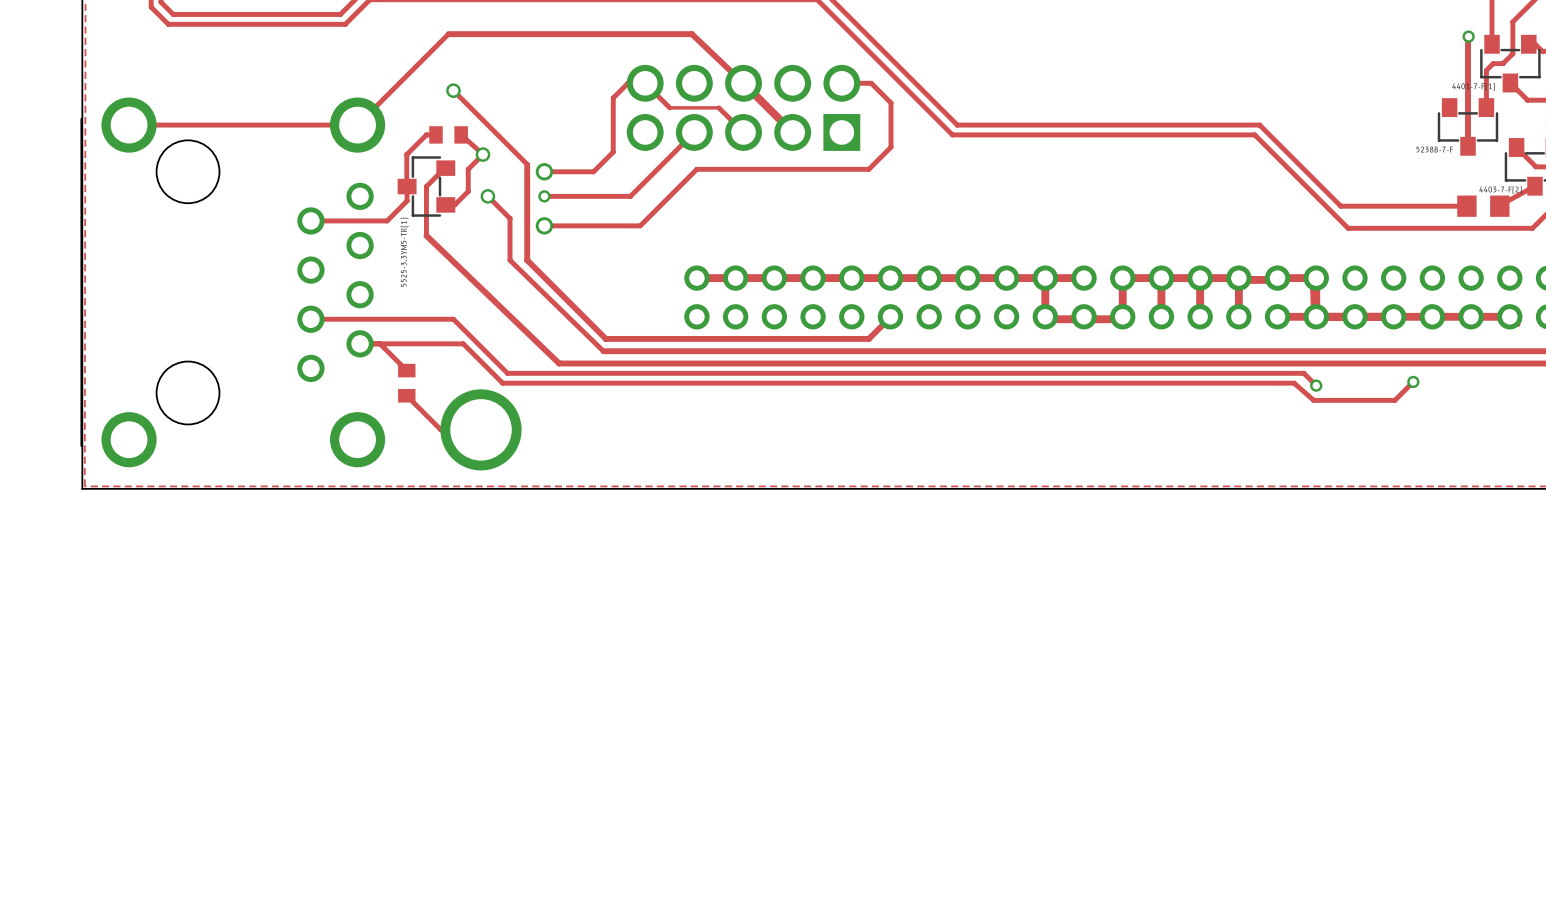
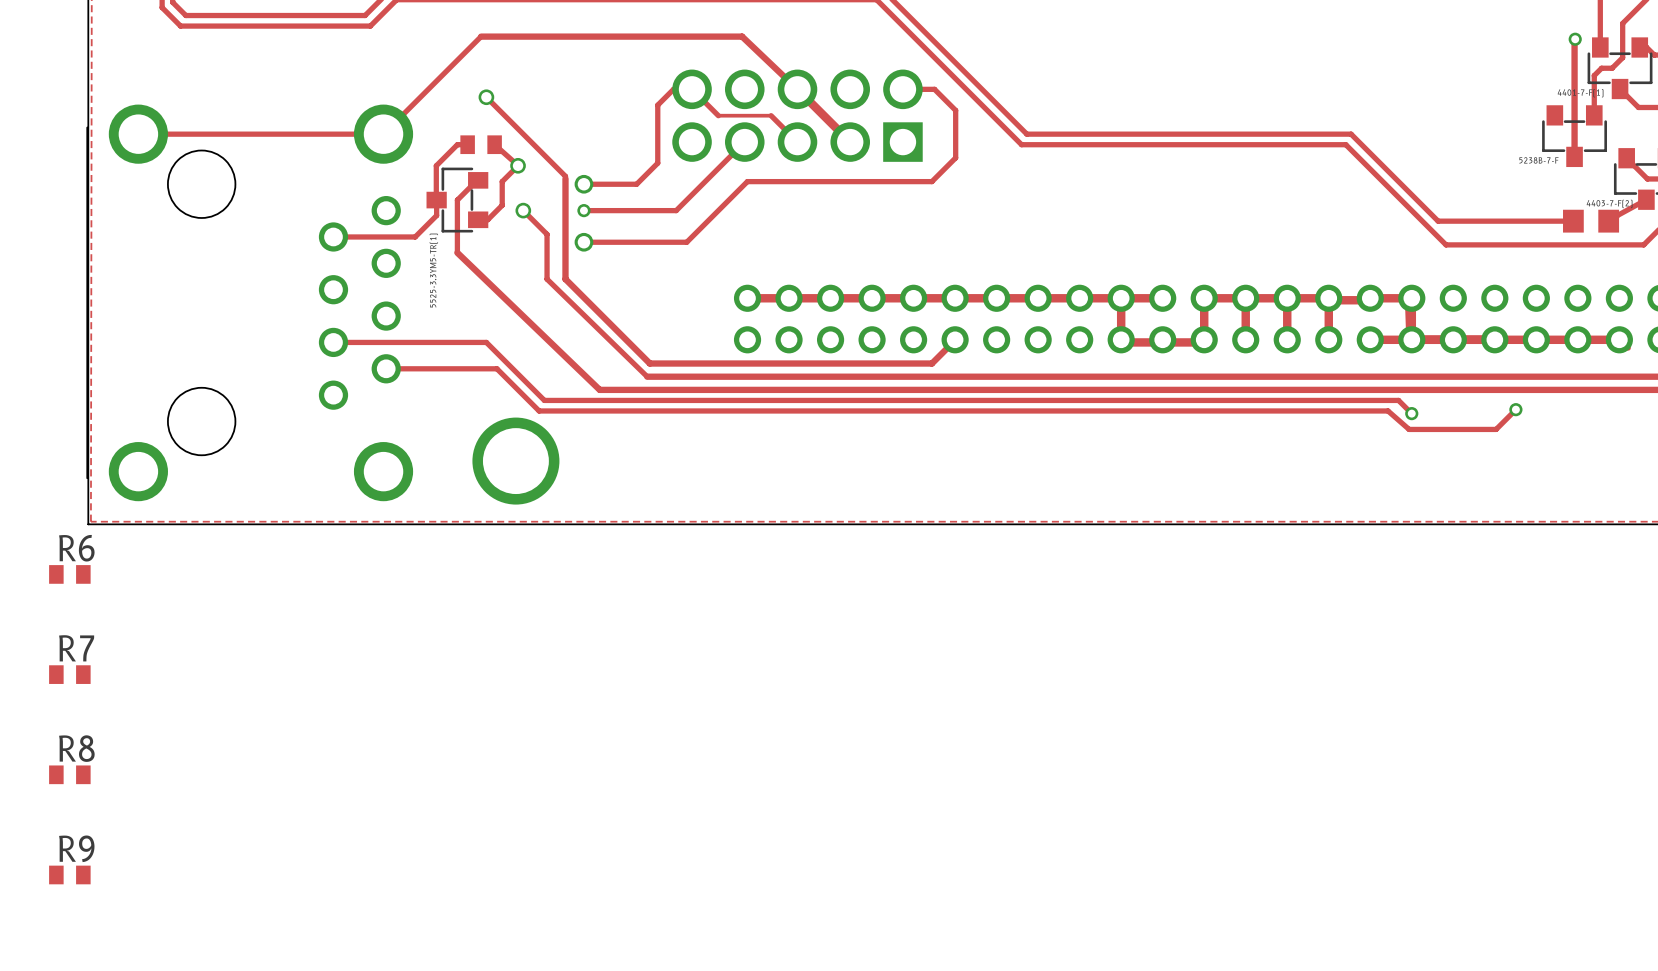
track: (380, 343) (406, 370) -> none
part: (406, 383) -> none
track: (406, 395) (440, 429) (481, 429) -> none
R6: none -> (69, 574)
R7: none -> (69, 674)
R8: none -> (69, 774)
R9: none -> (69, 874)

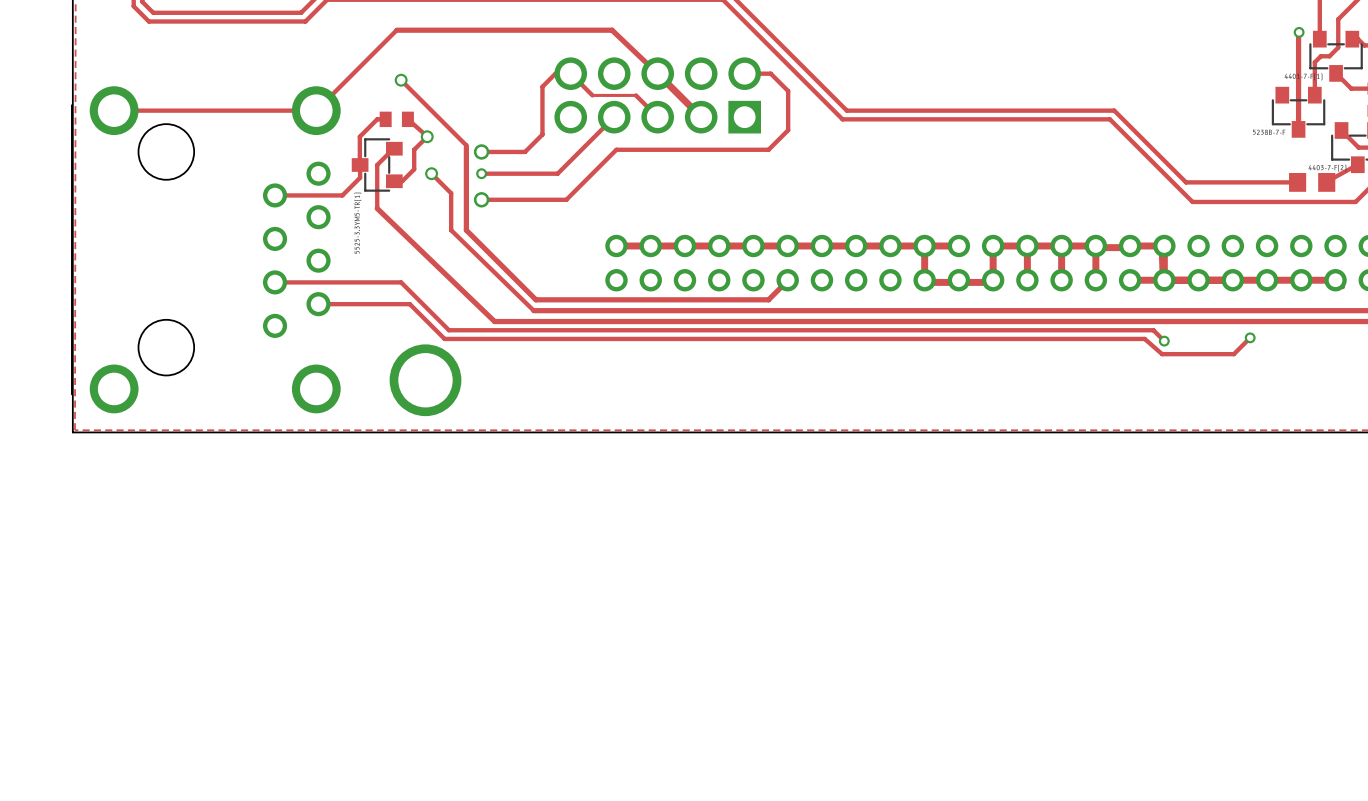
R6: (69, 574) -> none
R7: (69, 674) -> none
R8: (69, 774) -> none
R9: (69, 874) -> none

